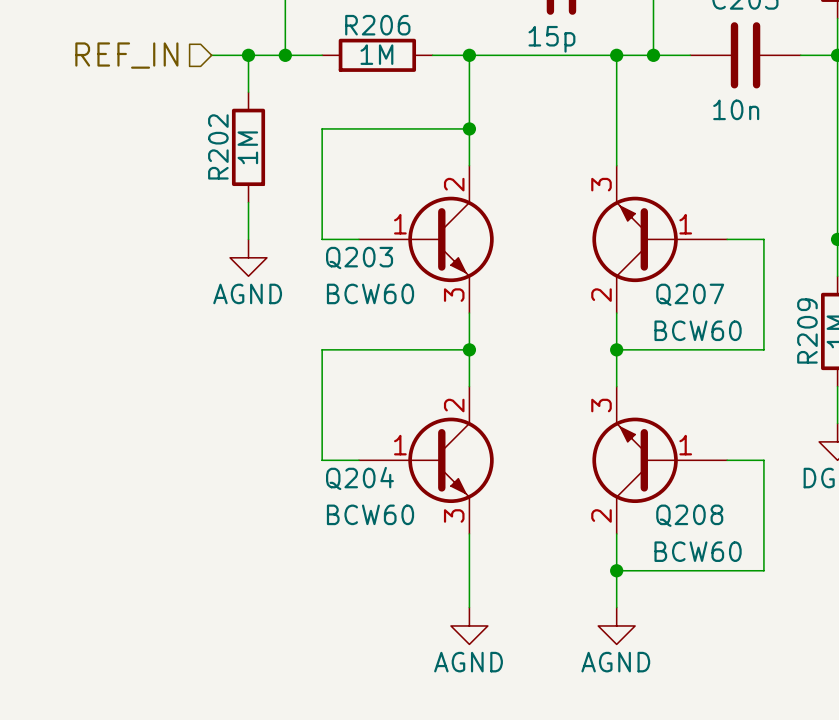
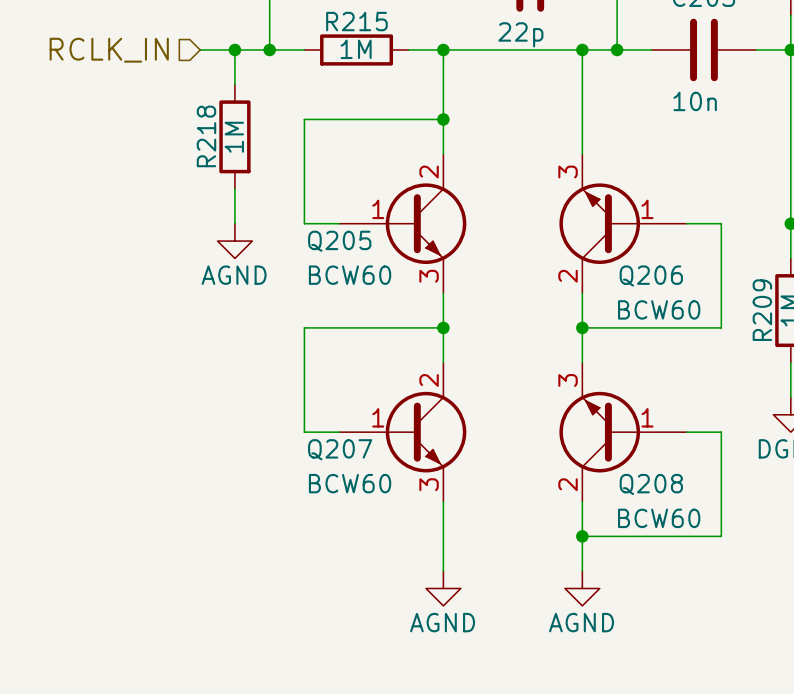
R206 name: R206 (377, 25) -> R215 (356, 21)
part value: 15p (551, 39) -> 22p (520, 34)
hierarchical label: REF_IN (126, 55) -> RCLK_IN (109, 50)
R202 name: R202 (218, 146) -> R218 (206, 136)
Q203 name: Q203 (359, 258) -> Q205 (339, 241)
Q207 name: Q207 (690, 294) -> Q206 (651, 275)
Q204 name: Q204 (359, 478) -> Q207 (340, 449)

